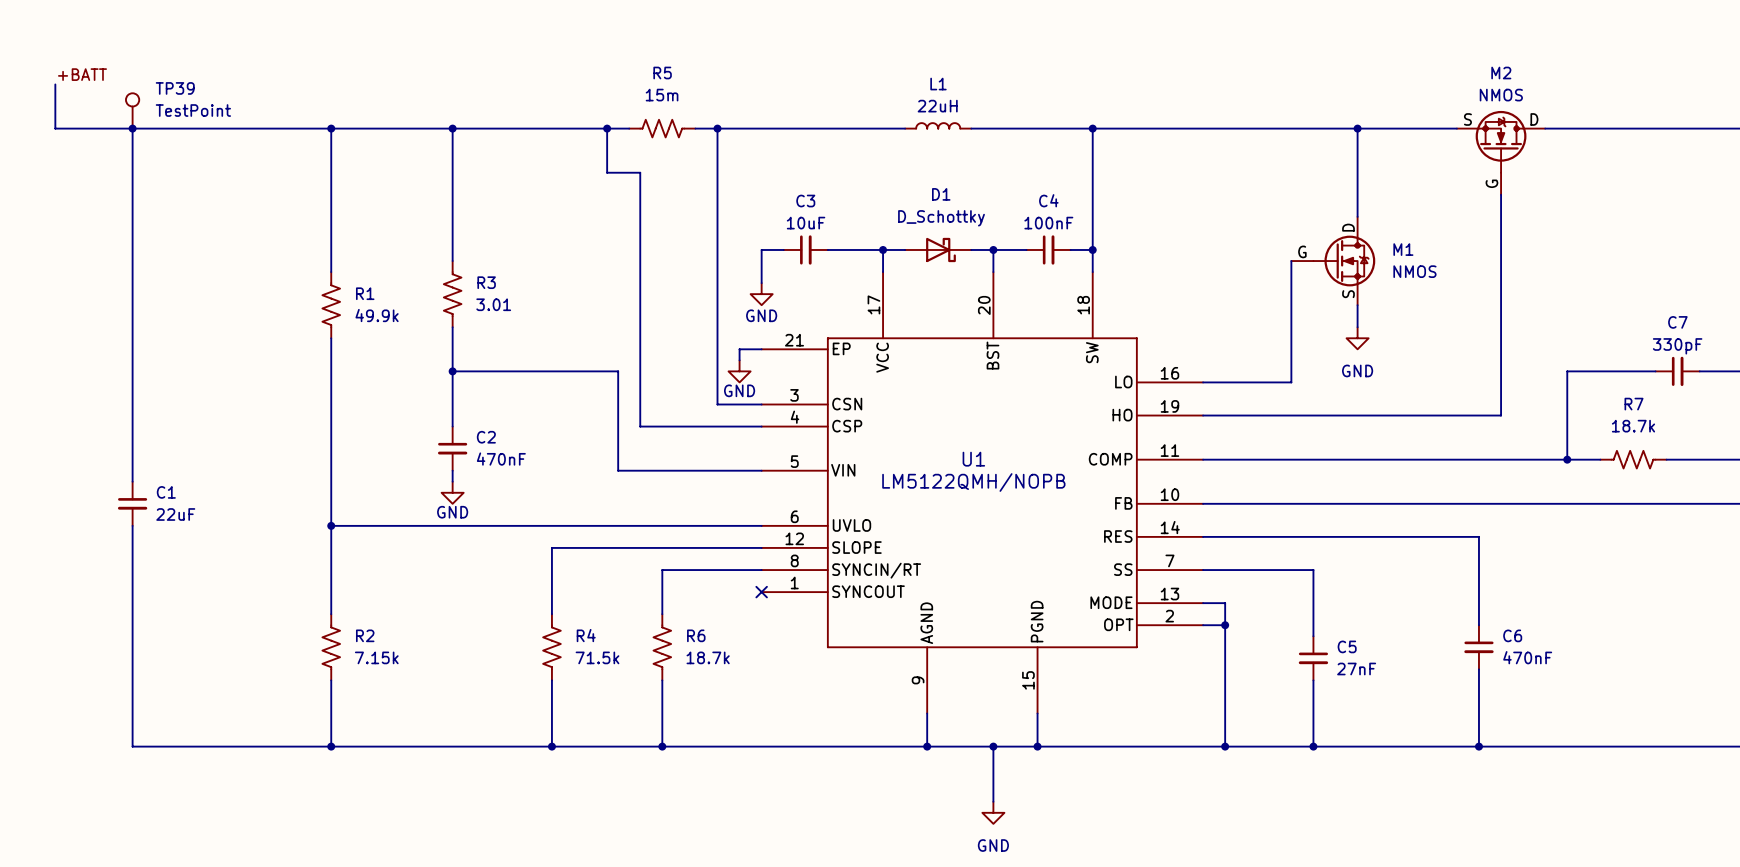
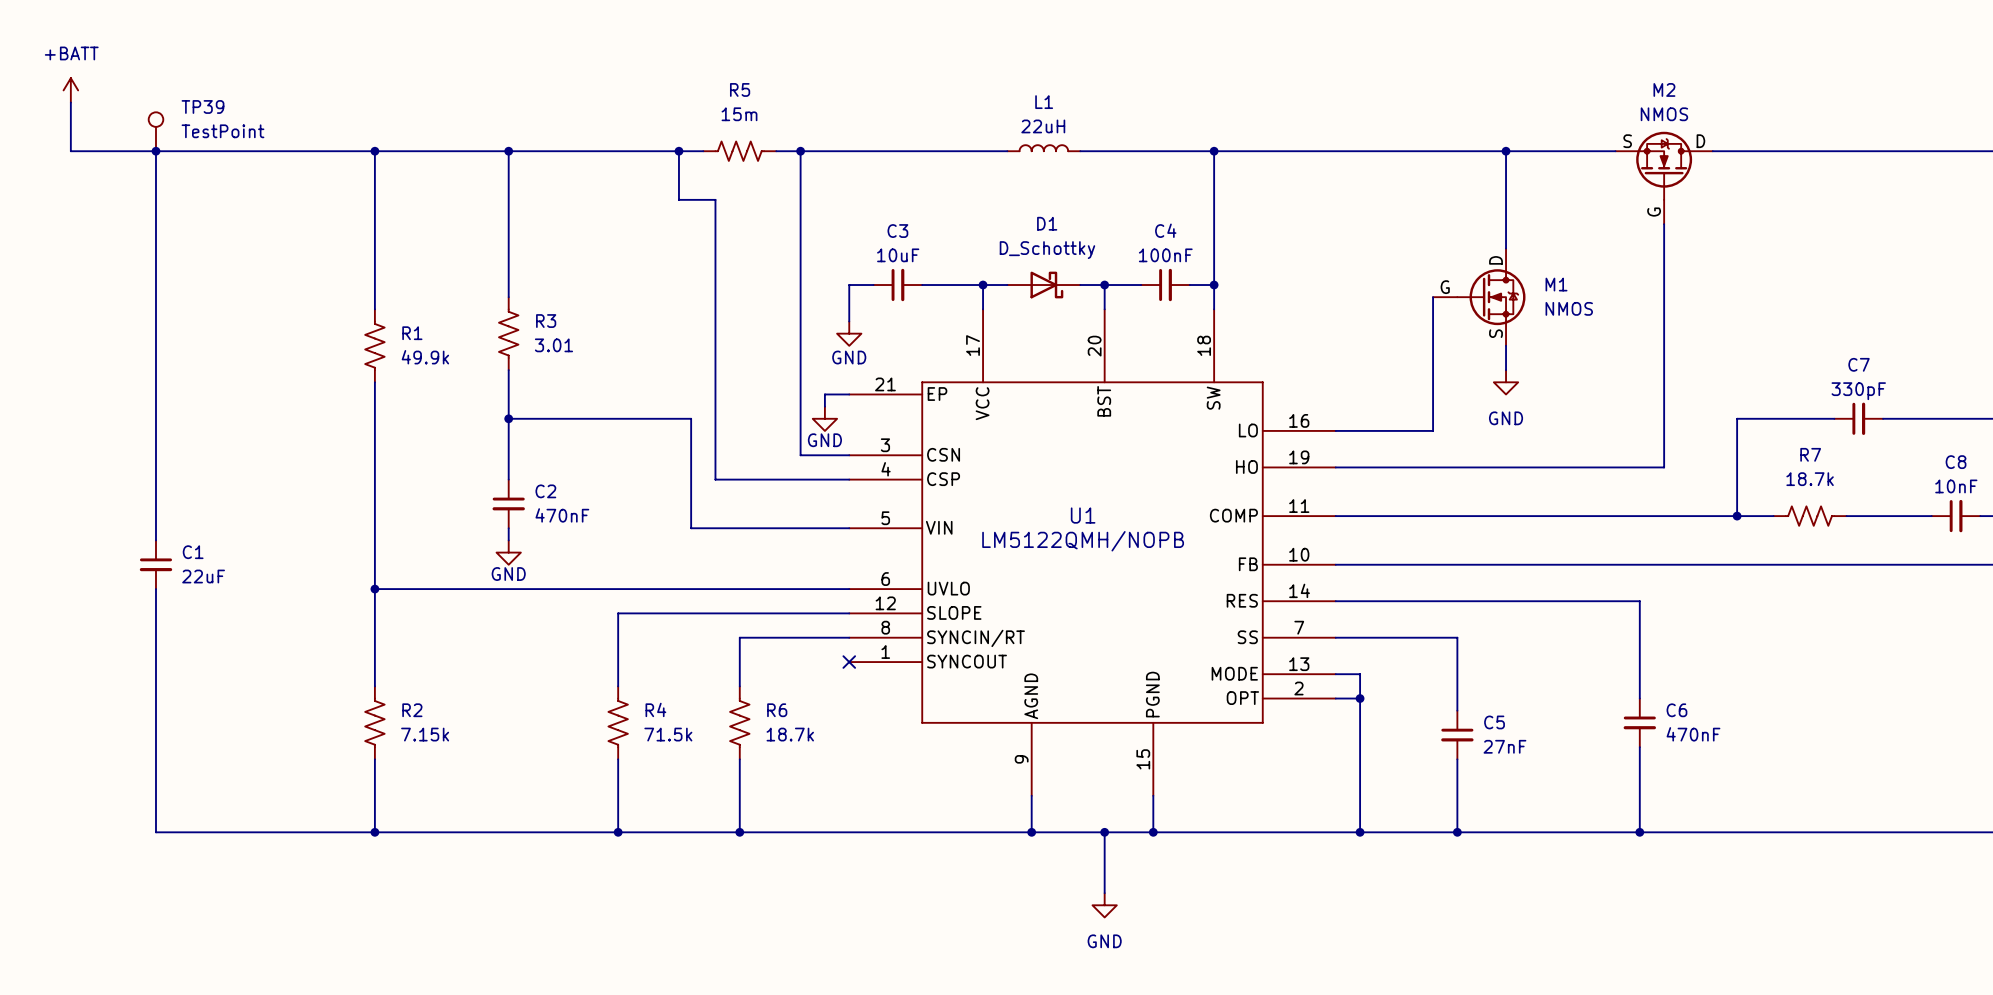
power symbol: none -> +BATT (70, 90)
label: +BATT (82, 74) -> none

